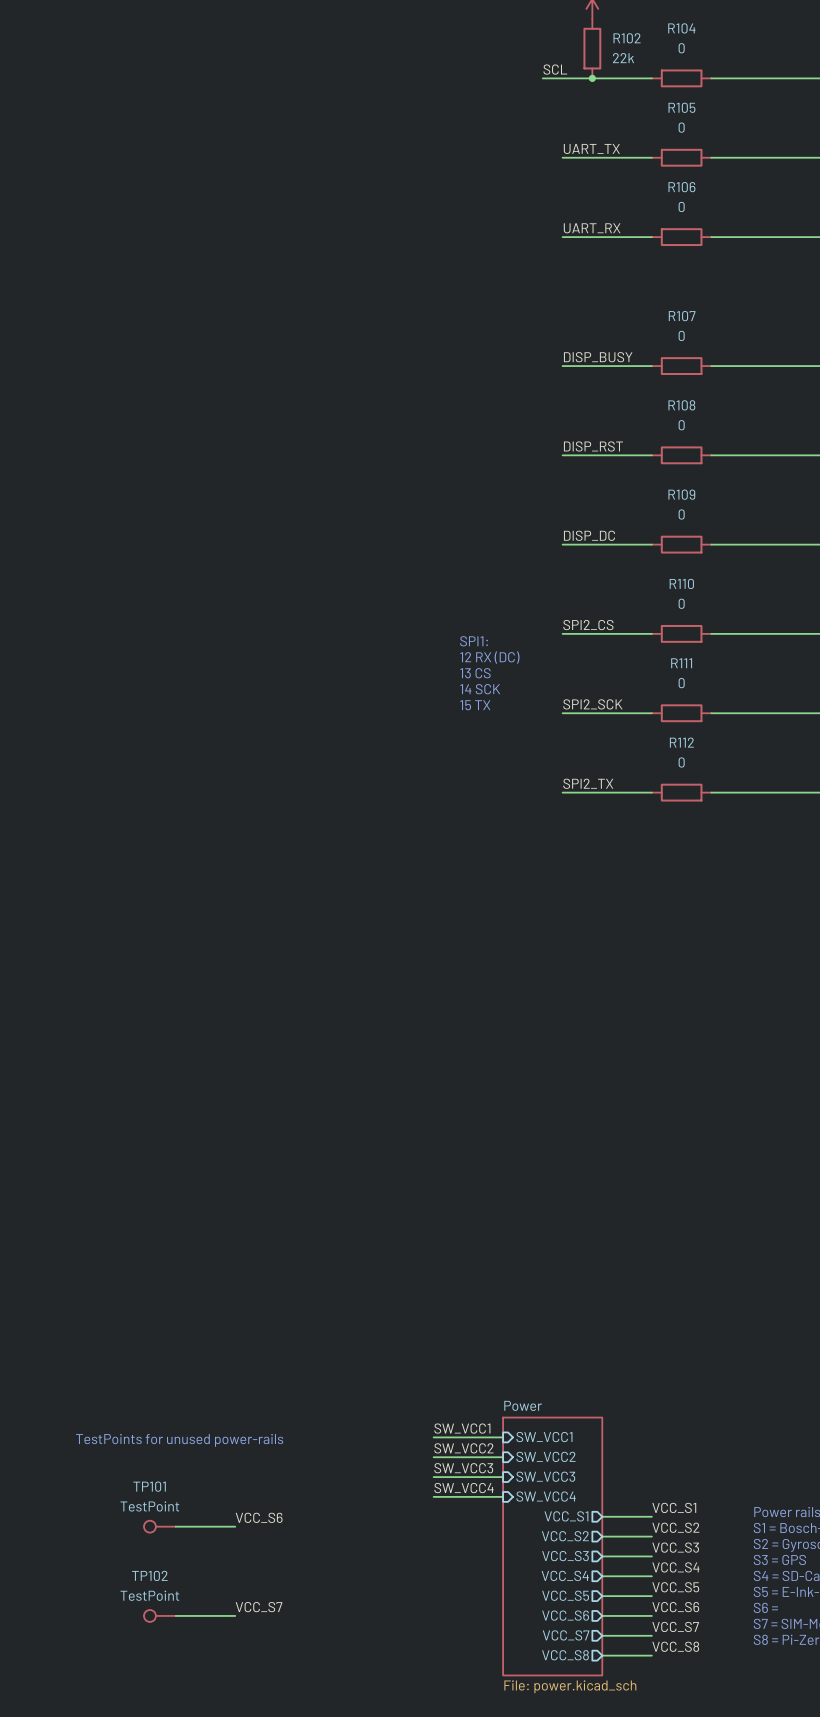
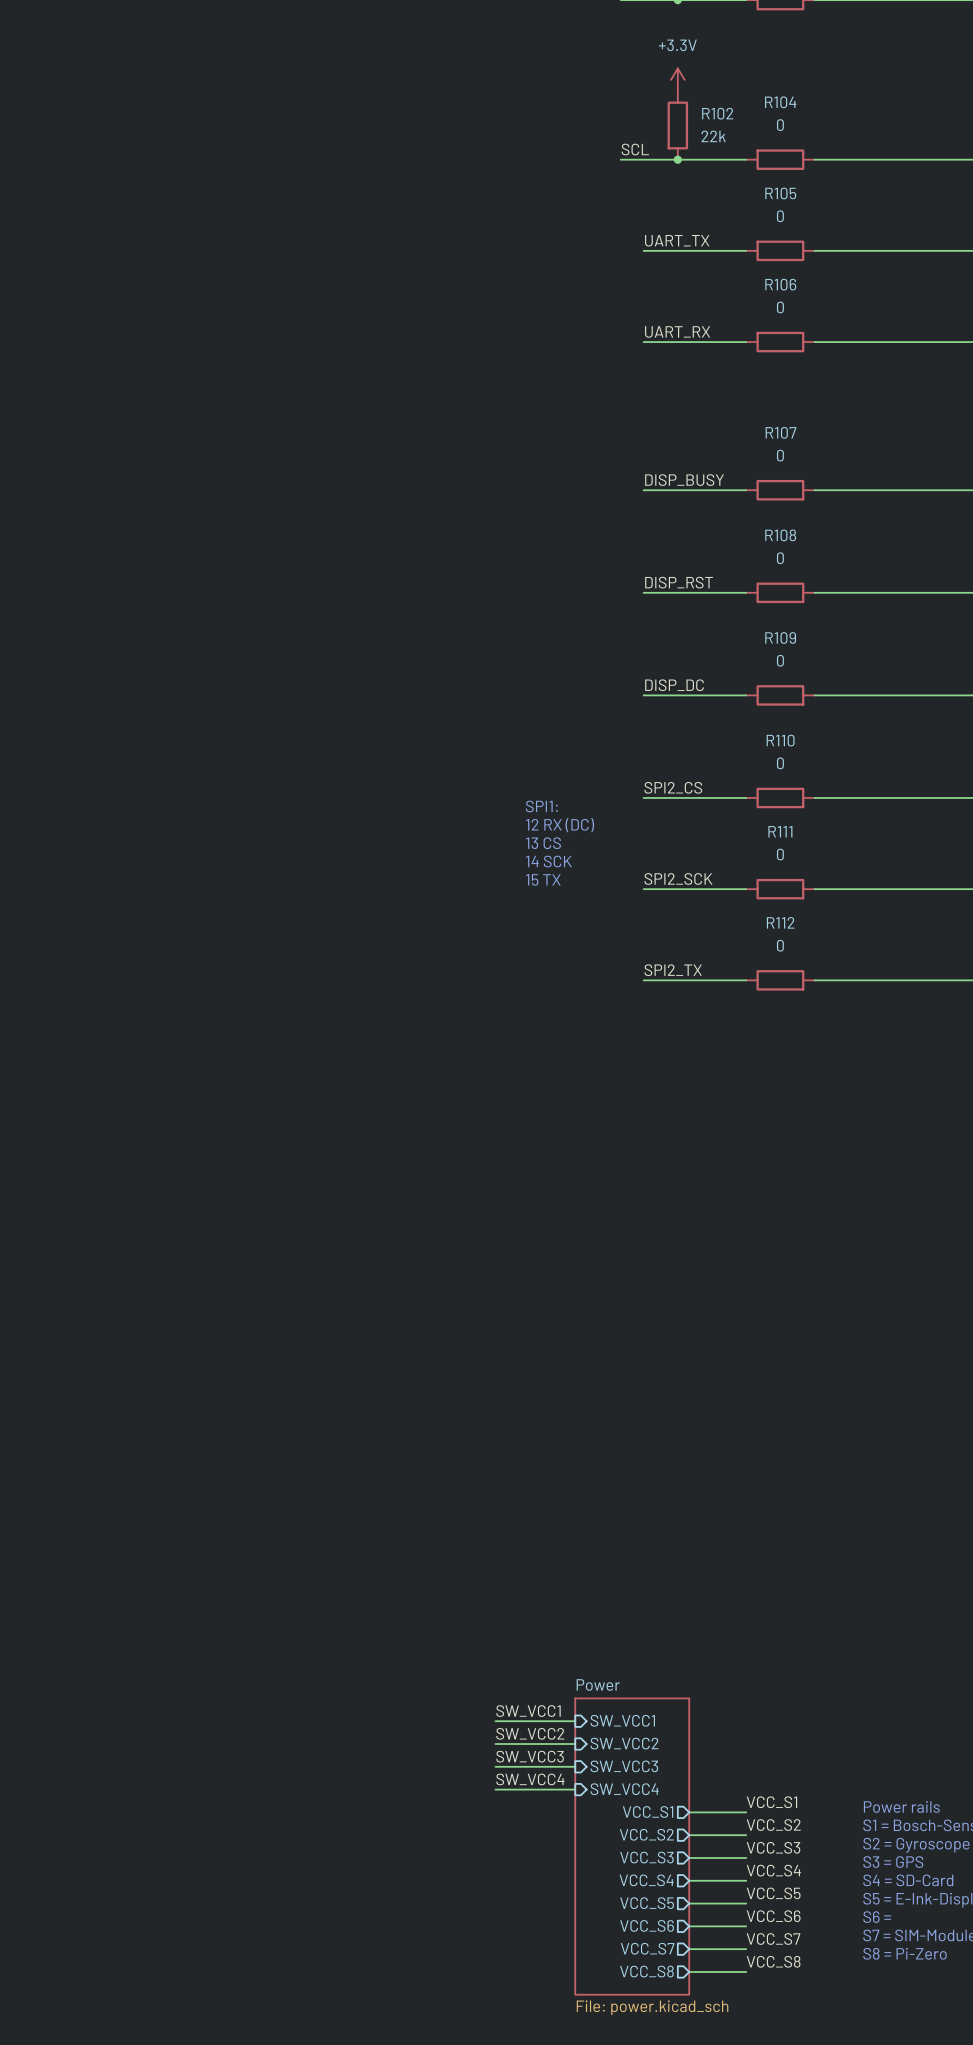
text: TestPoints for unused power-rails (179, 1440) -> none
label: VCC_S6 (259, 1517) -> none
TP101: TestPoint (159, 1526) -> none
wire: (175, 1526) (235, 1526) -> none
label: VCC_S7 (259, 1607) -> none
TP102: TestPoint (159, 1615) -> none
wire: (175, 1615) (235, 1615) -> none

